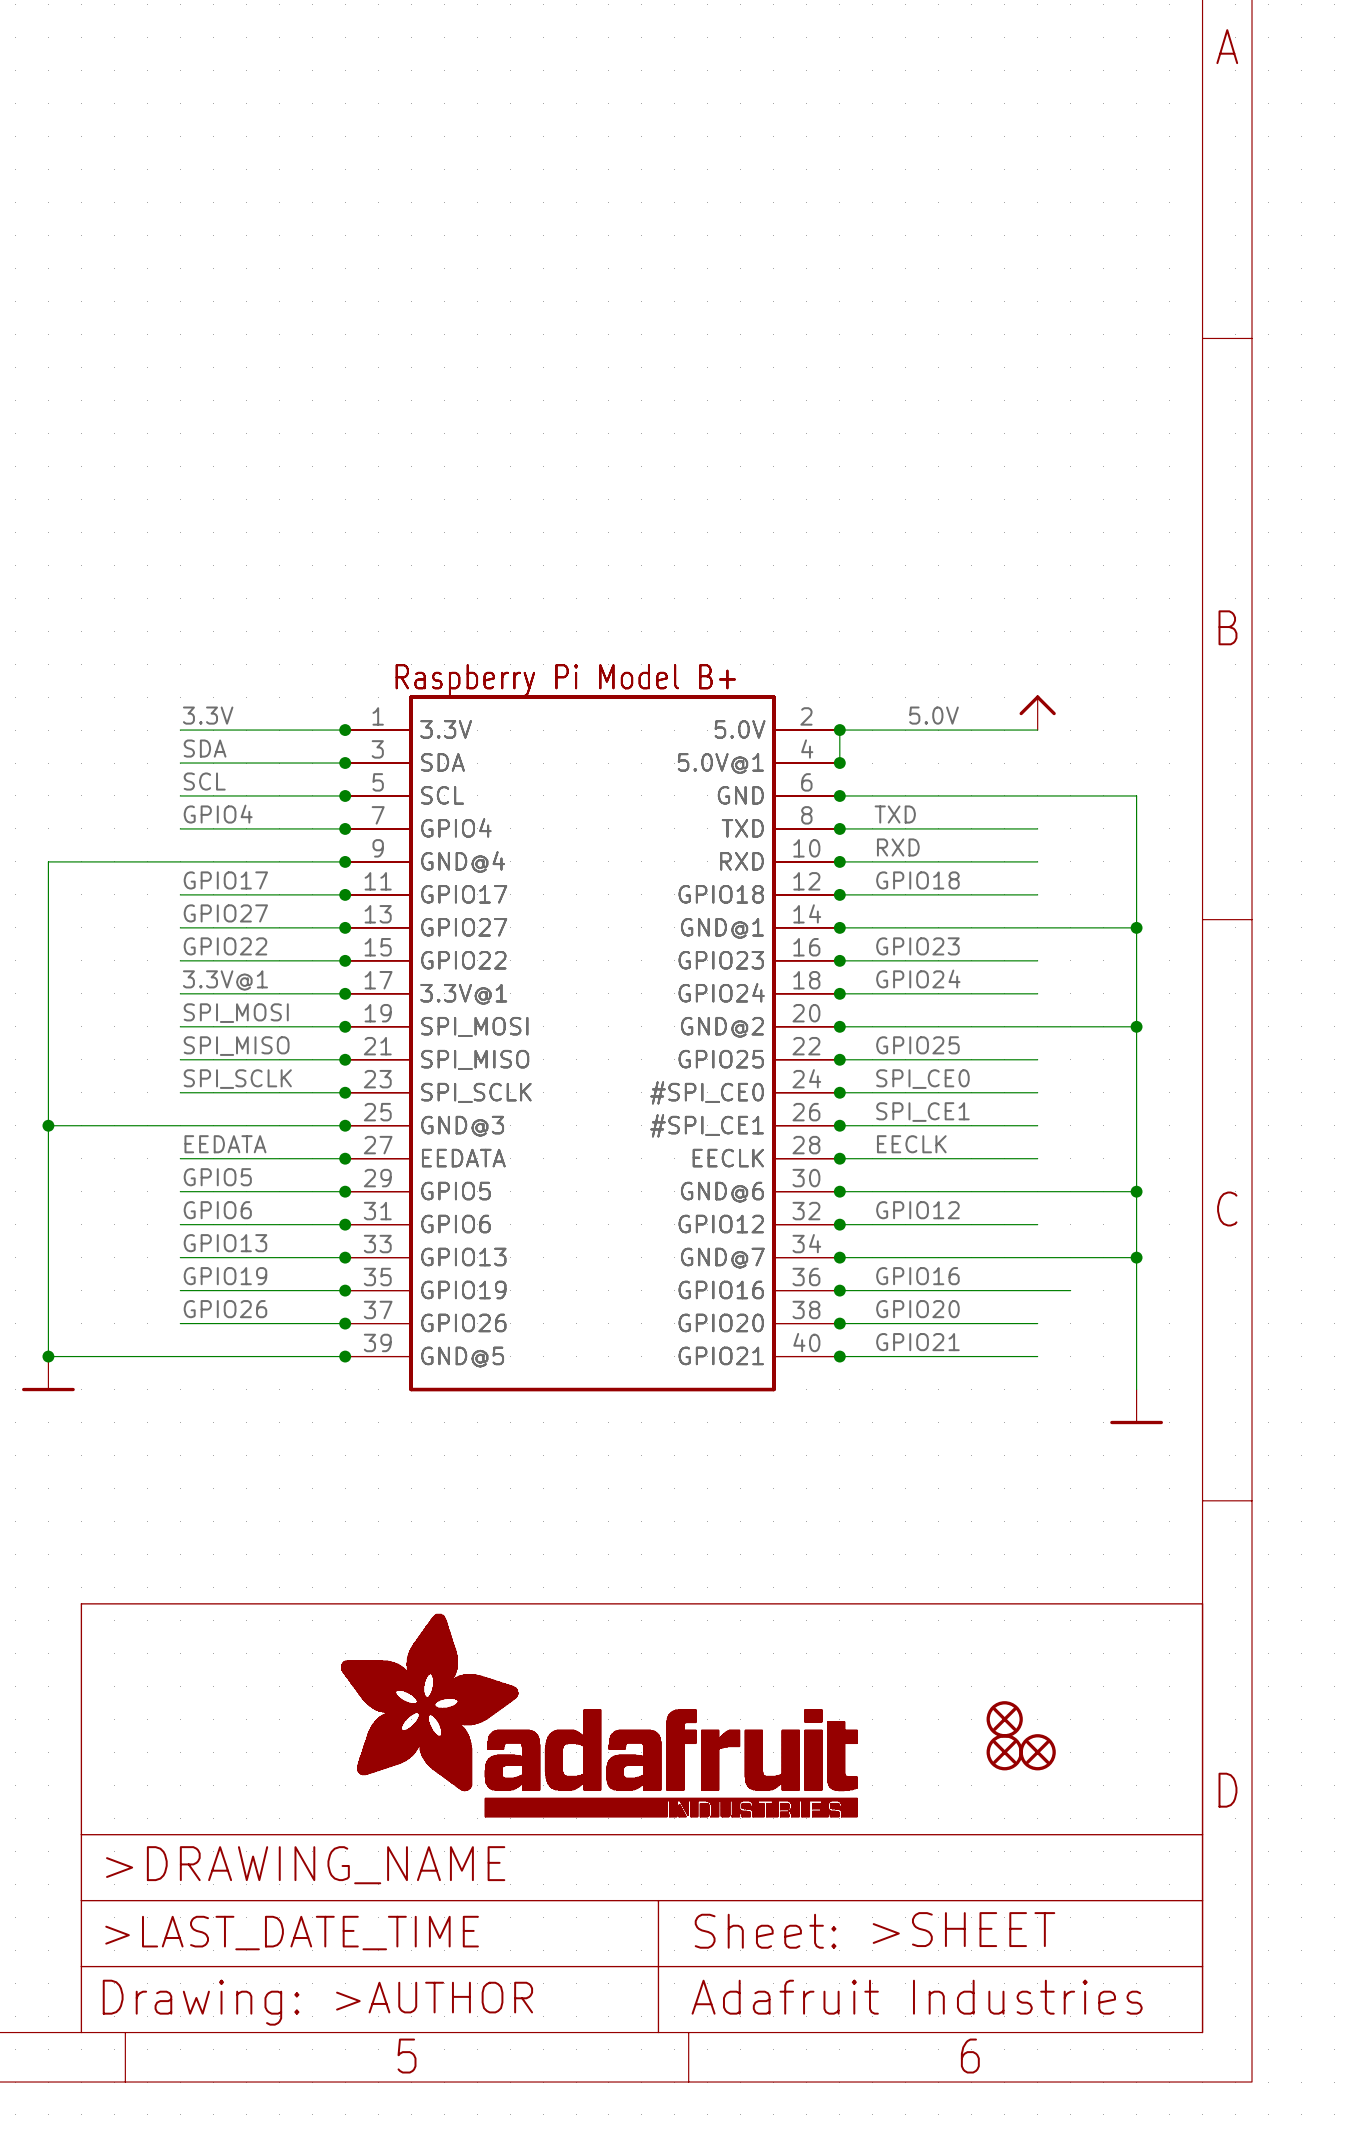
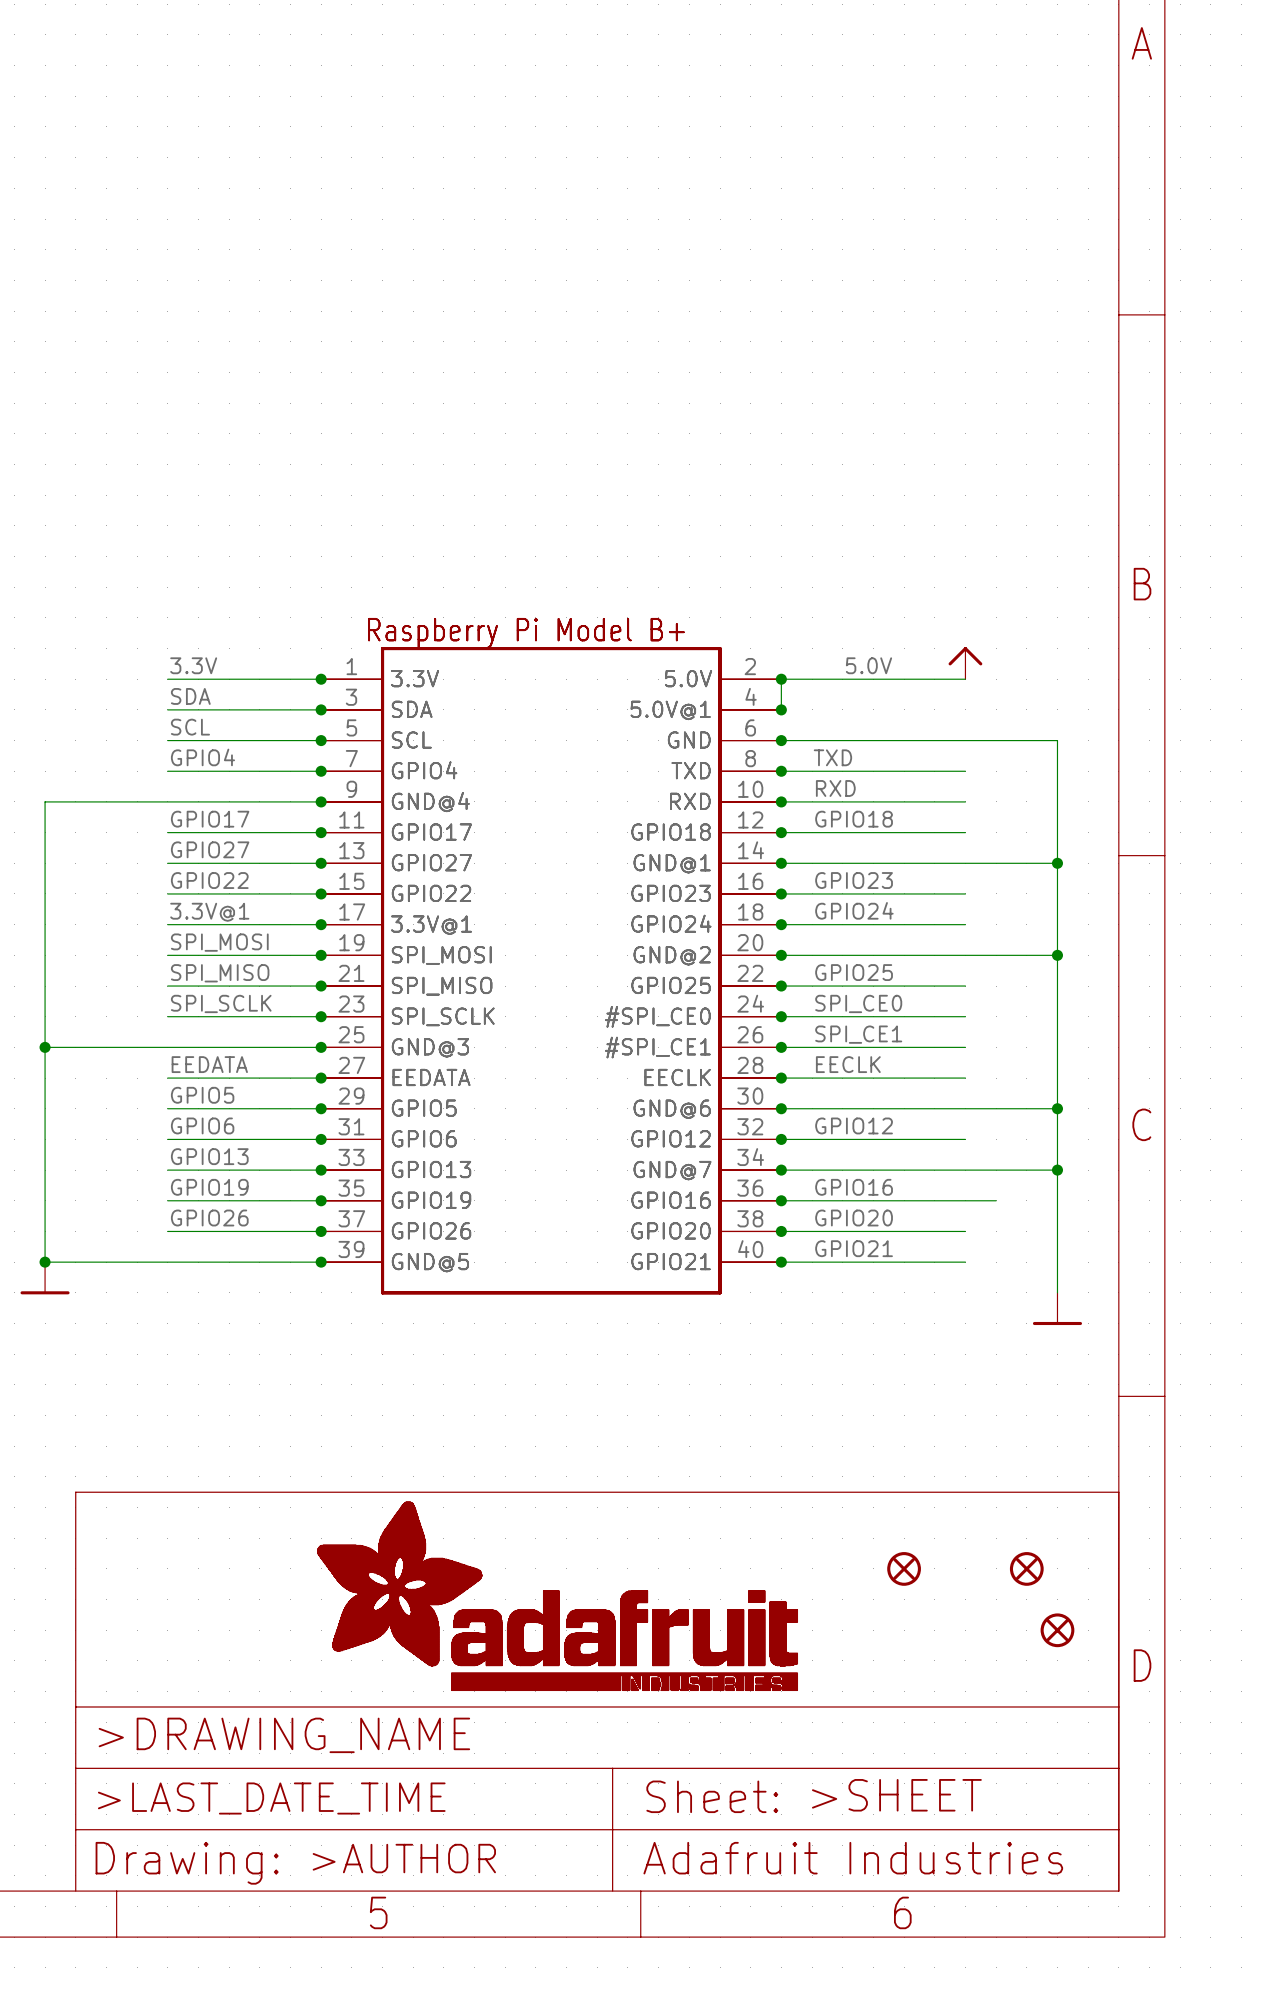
part: none -> (904, 1568)
part: none -> (1026, 1568)
part: (1004, 1719) -> none
part: (1004, 1752) -> none
part: (1037, 1752) -> none
part: none -> (1057, 1630)

